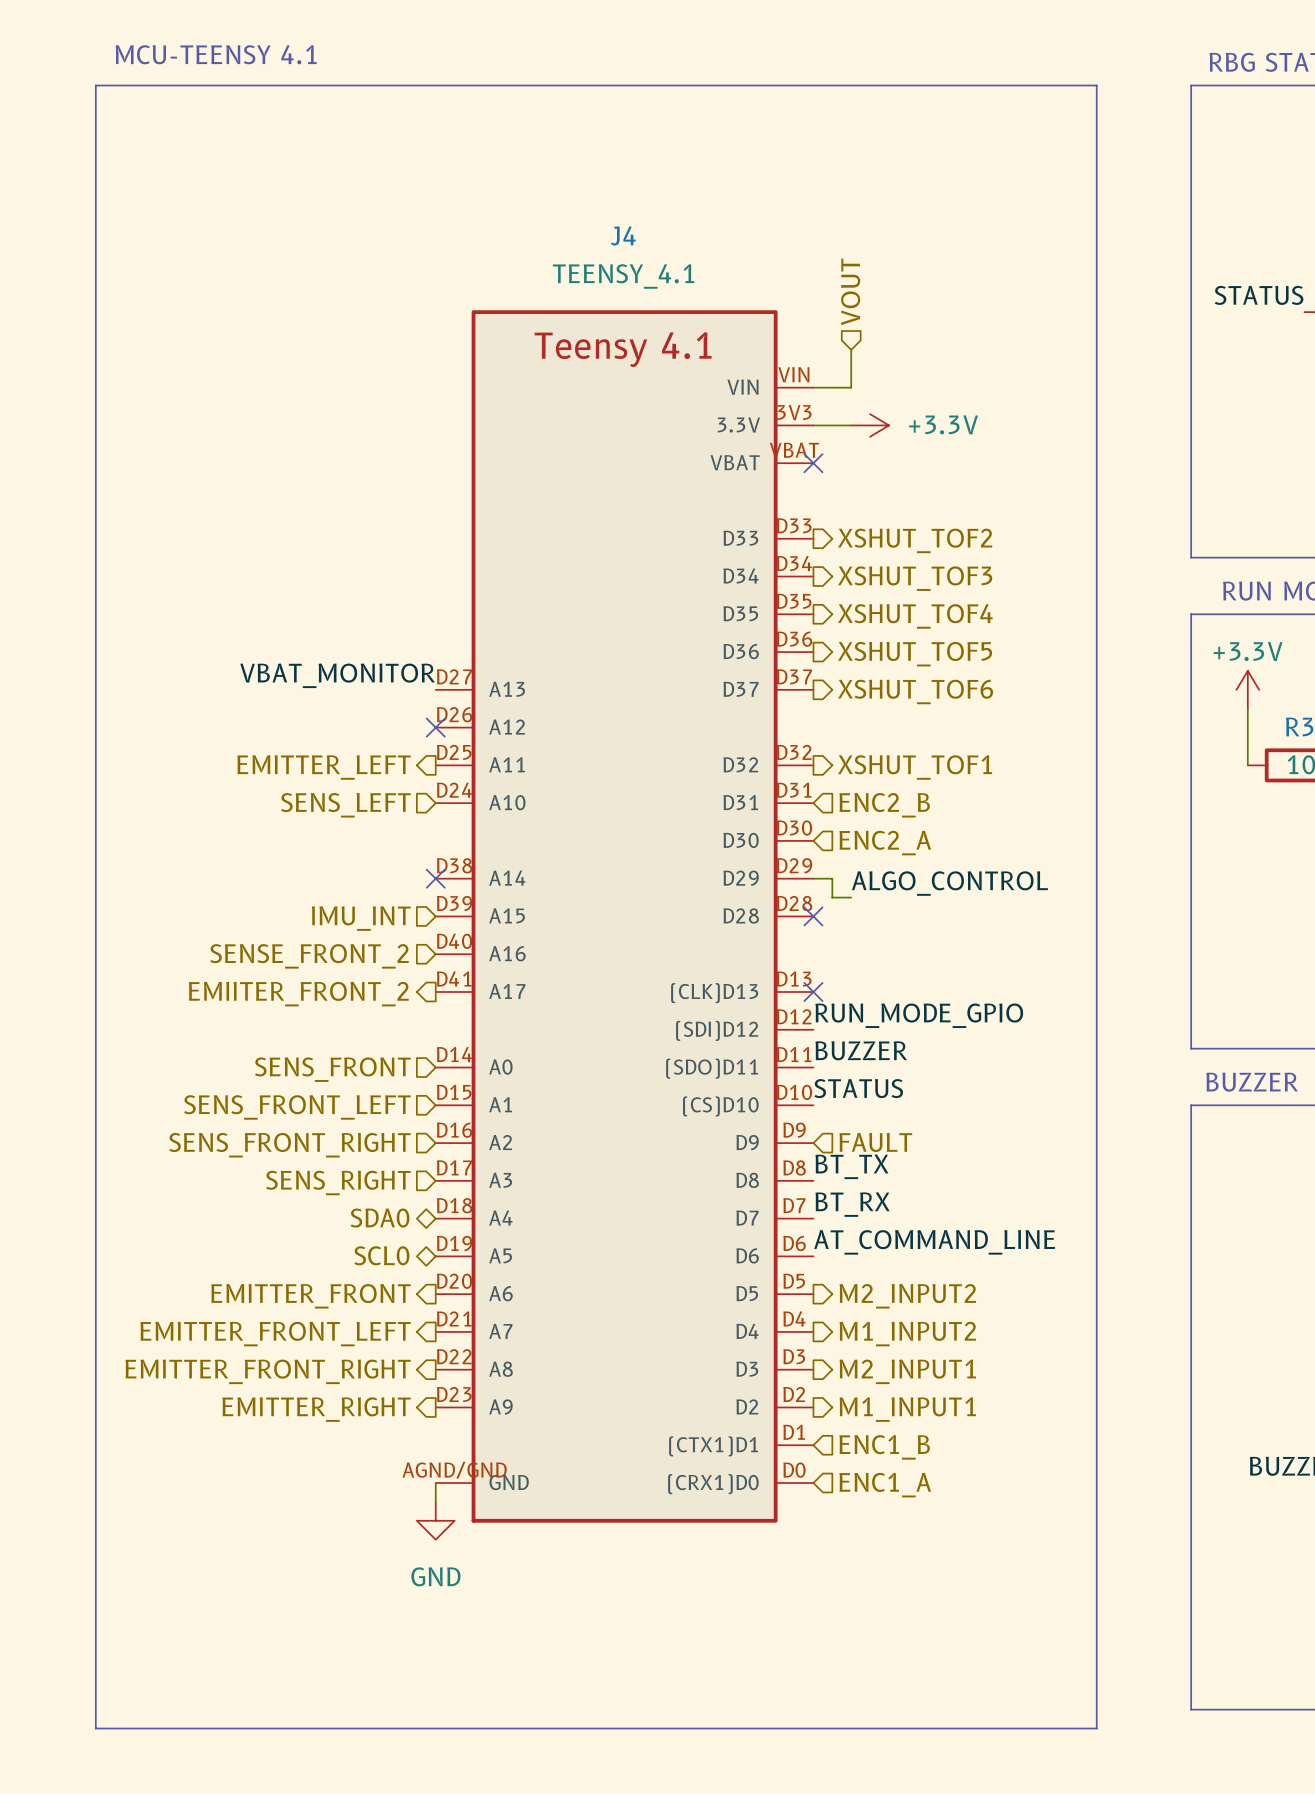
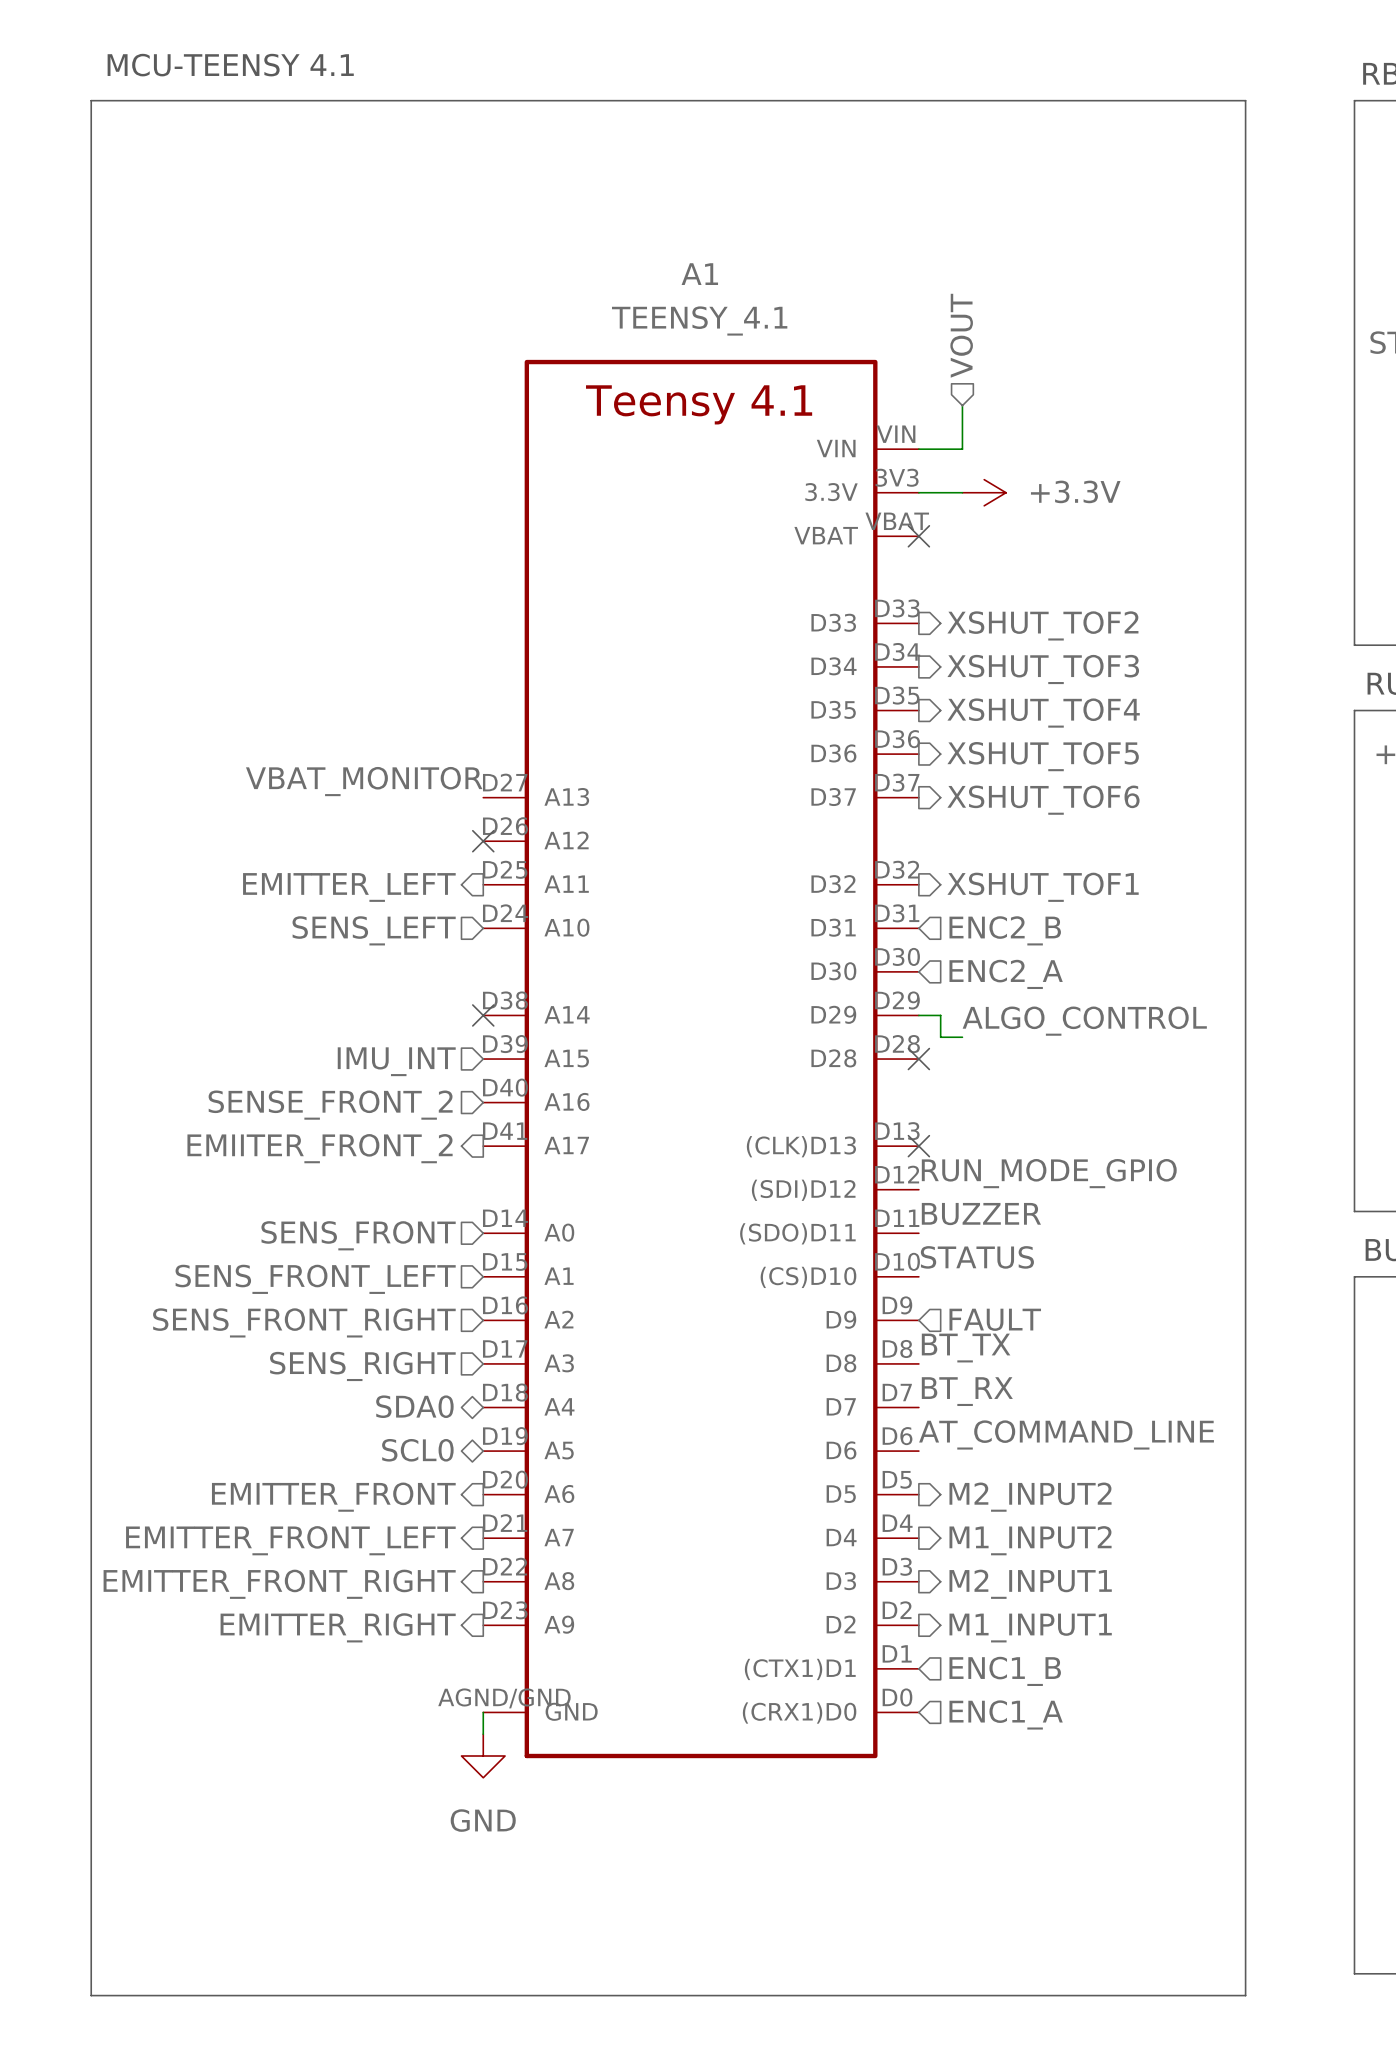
J4 name: J4 (623, 235) -> A1 (699, 274)

